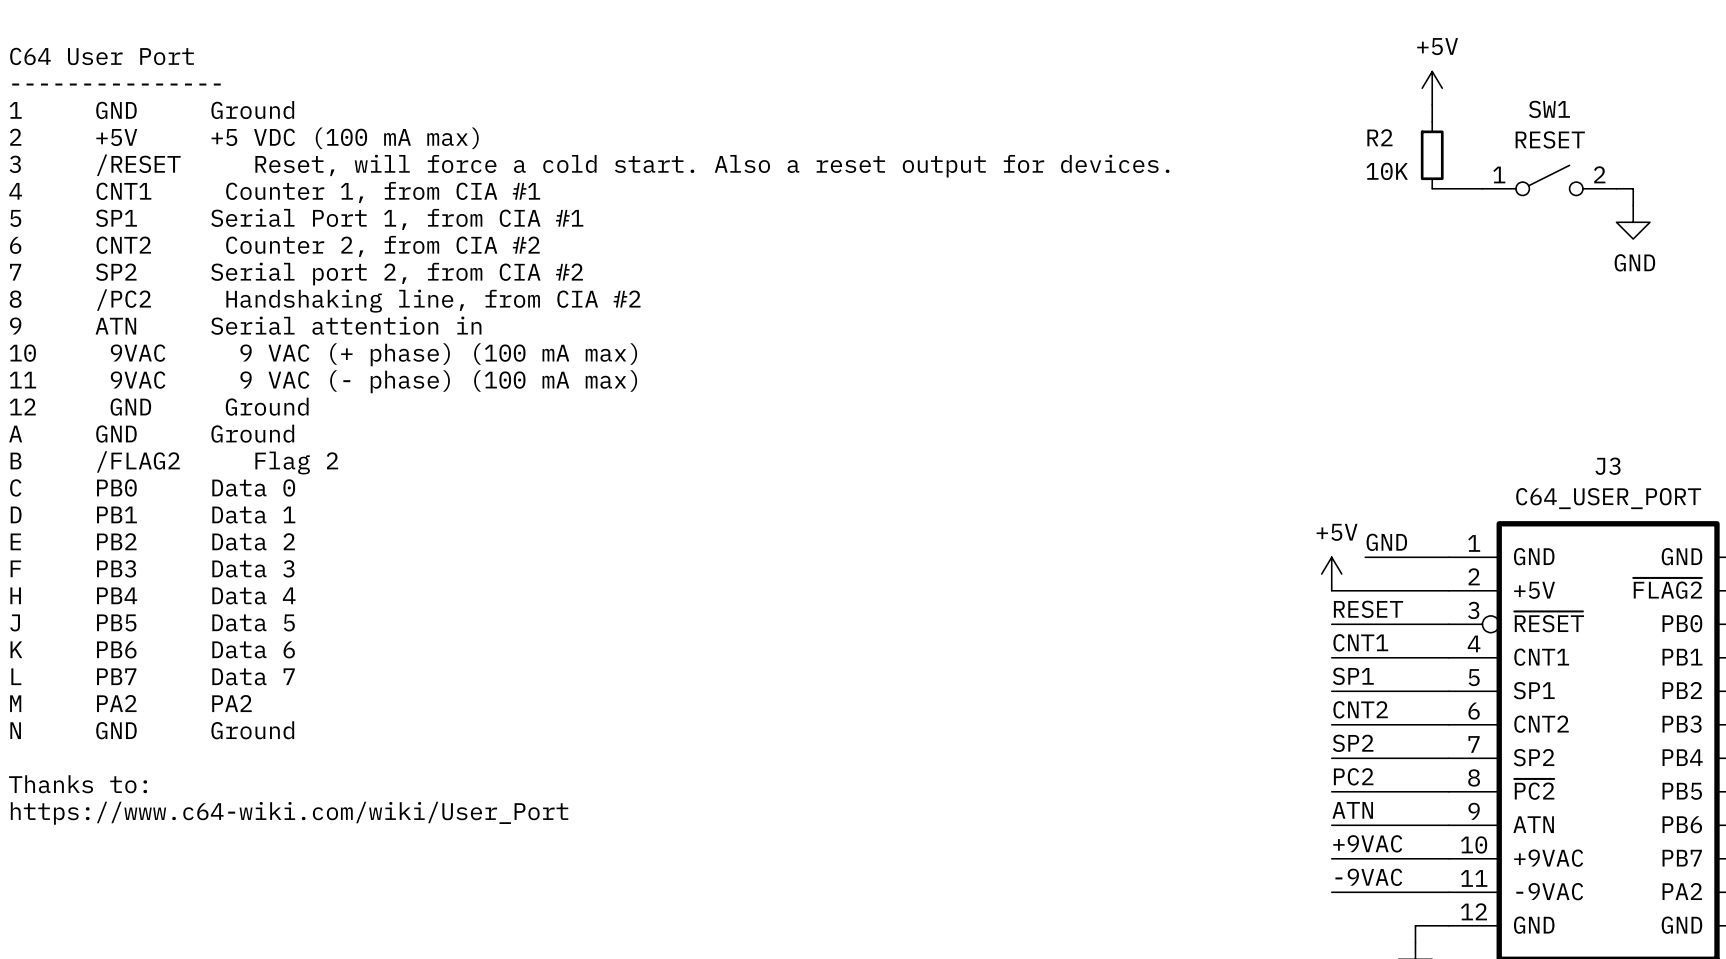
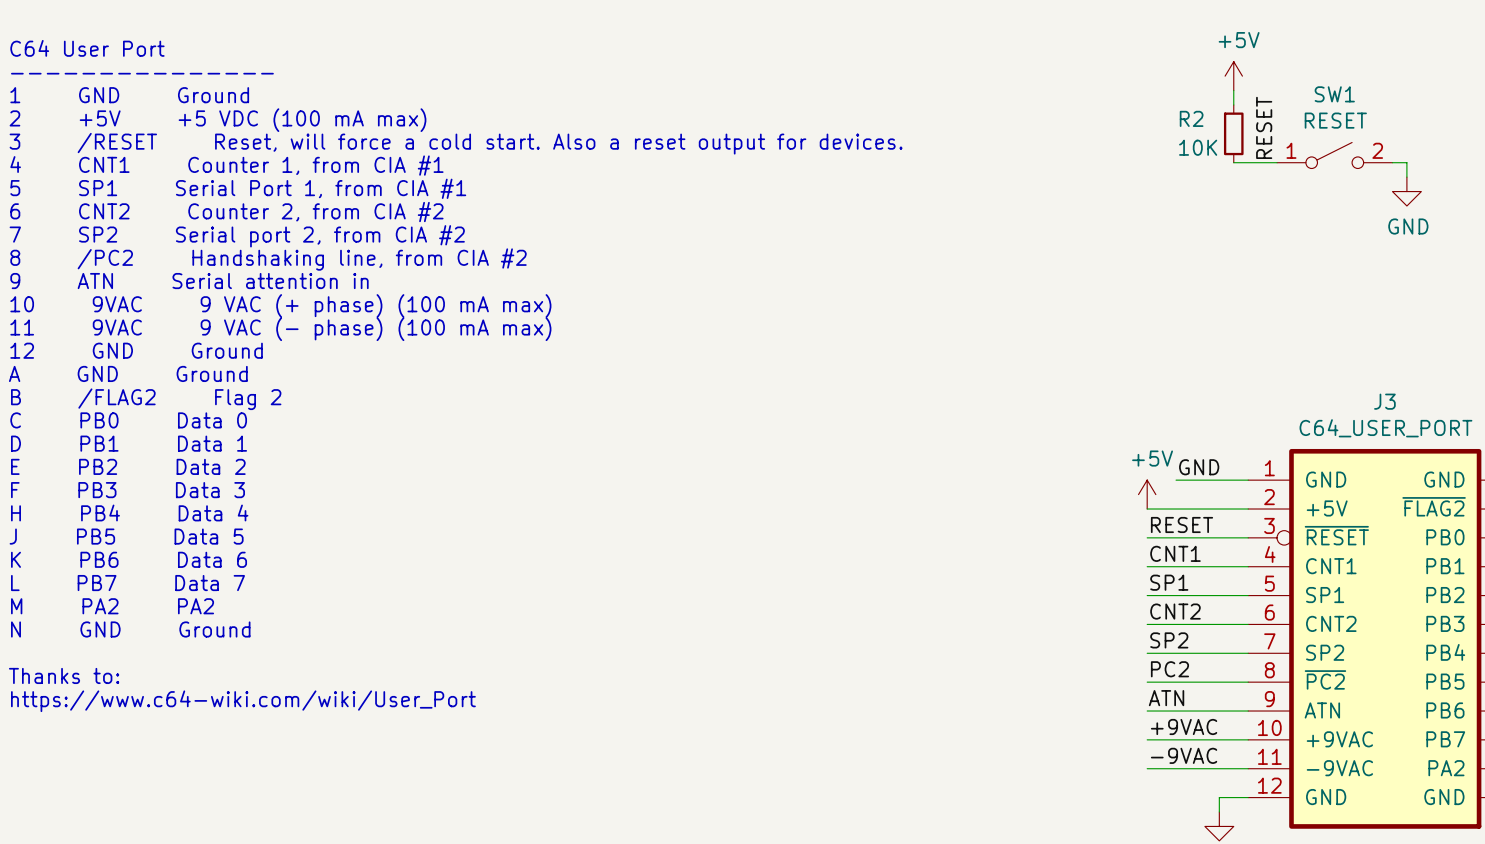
label: none -> RESET (1264, 127)

